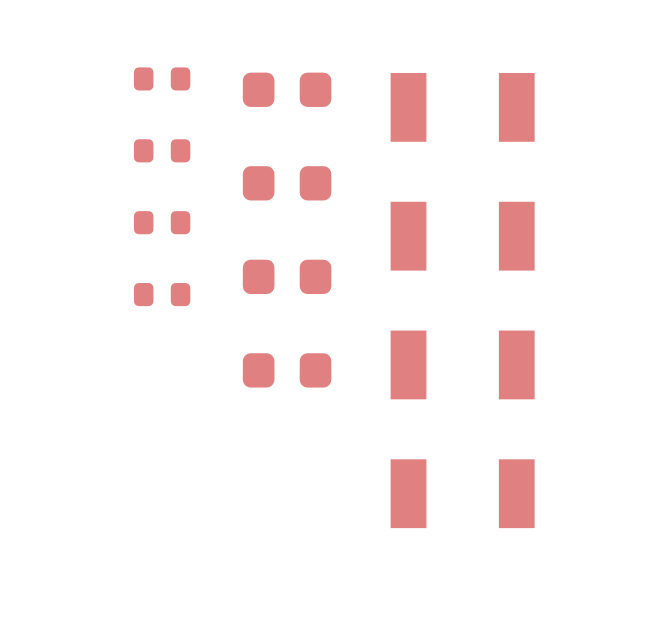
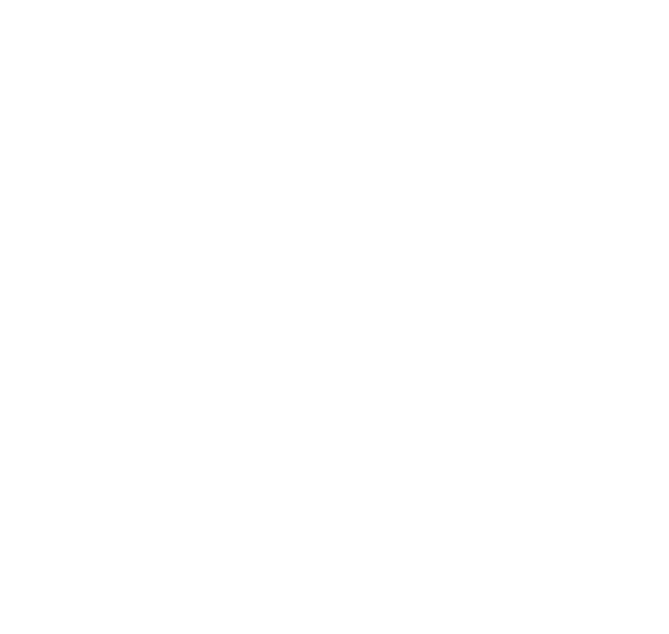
part: (162, 78) -> none
part: (287, 89) -> none
part: (462, 107) -> none
part: (162, 150) -> none
part: (287, 183) -> none
part: (162, 222) -> none
part: (462, 236) -> none
part: (287, 276) -> none
part: (162, 294) -> none
part: (462, 364) -> none
part: (287, 370) -> none
part: (462, 493) -> none

